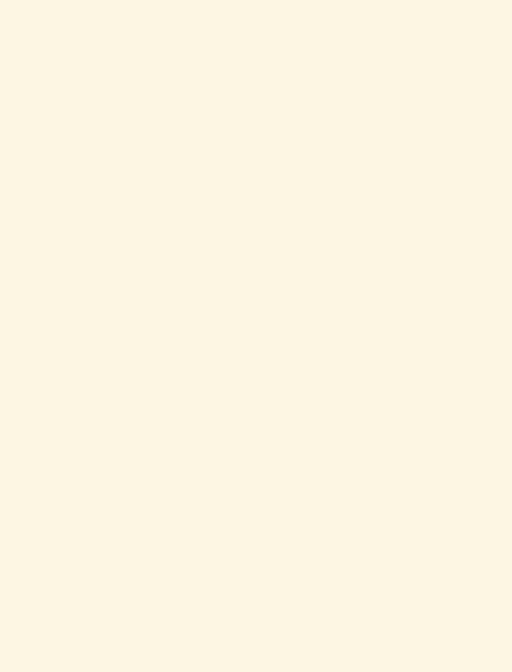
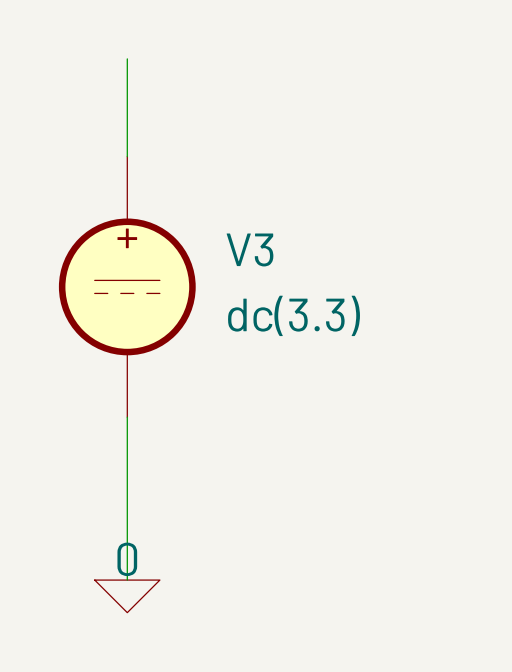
wire: none -> (127, 58) (127, 156)
V3: none -> dc(3.3) (127, 286)
wire: none -> (127, 417) (127, 580)
power symbol: none -> 0 (127, 596)

